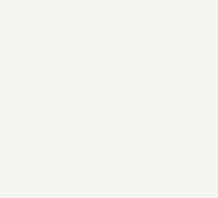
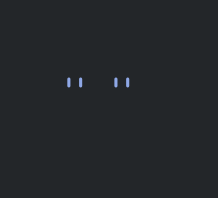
text: none -> " " (98, 82)

